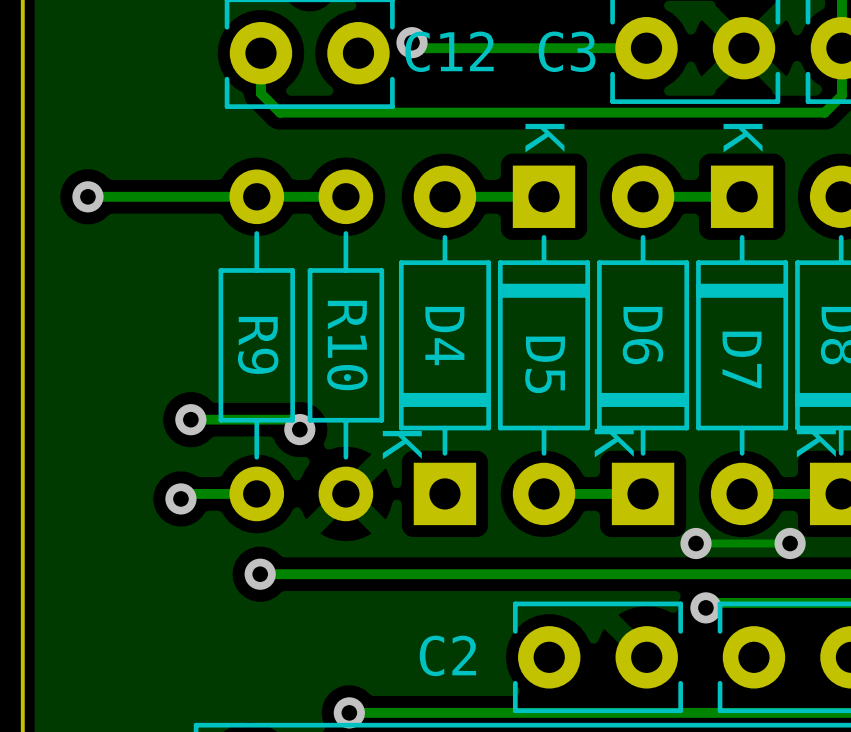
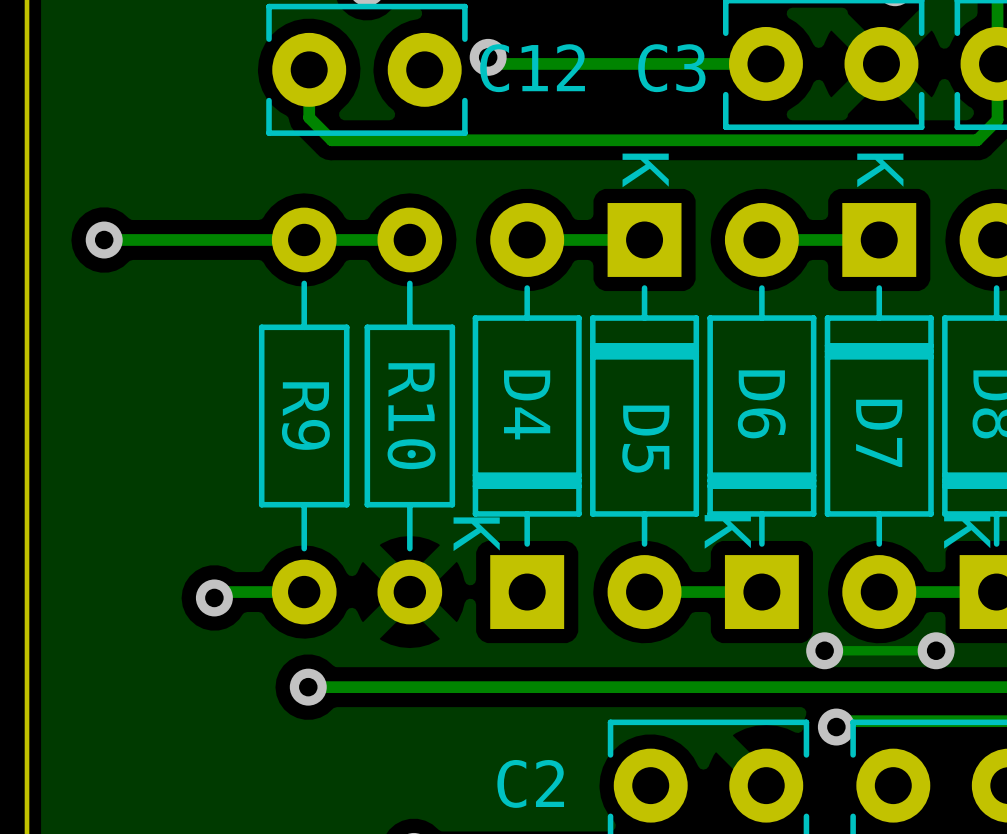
track: (190, 419) (289, 419) (299, 429) -> none
via: (190, 419) -> none
via: (299, 429) -> none

